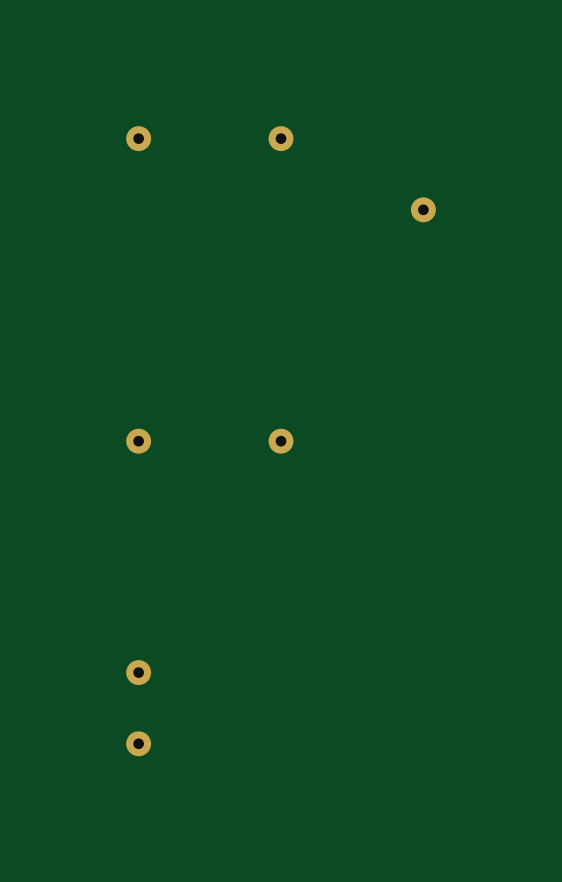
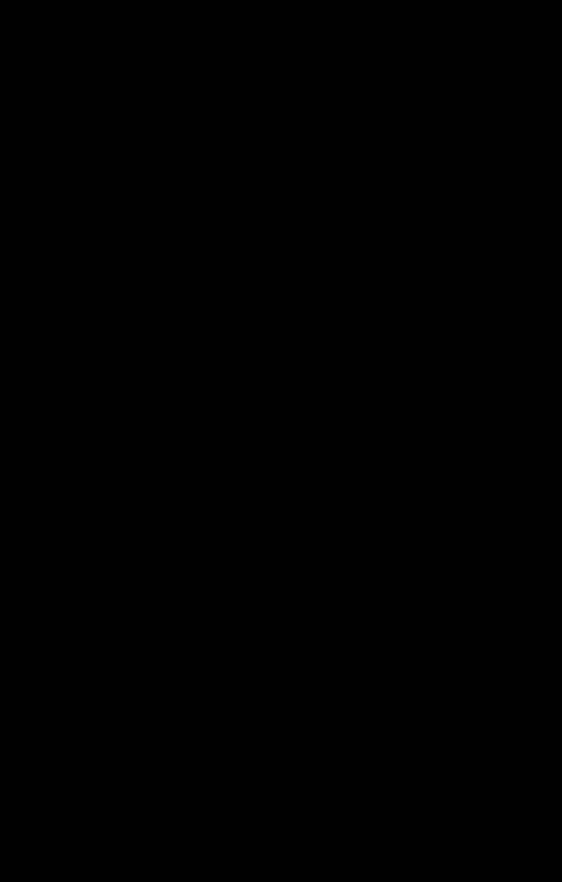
via: (138, 138) -> none
via: (281, 138) -> none
via: (423, 209) -> none
via: (138, 441) -> none
via: (281, 441) -> none
via: (138, 672) -> none
via: (138, 743) -> none

